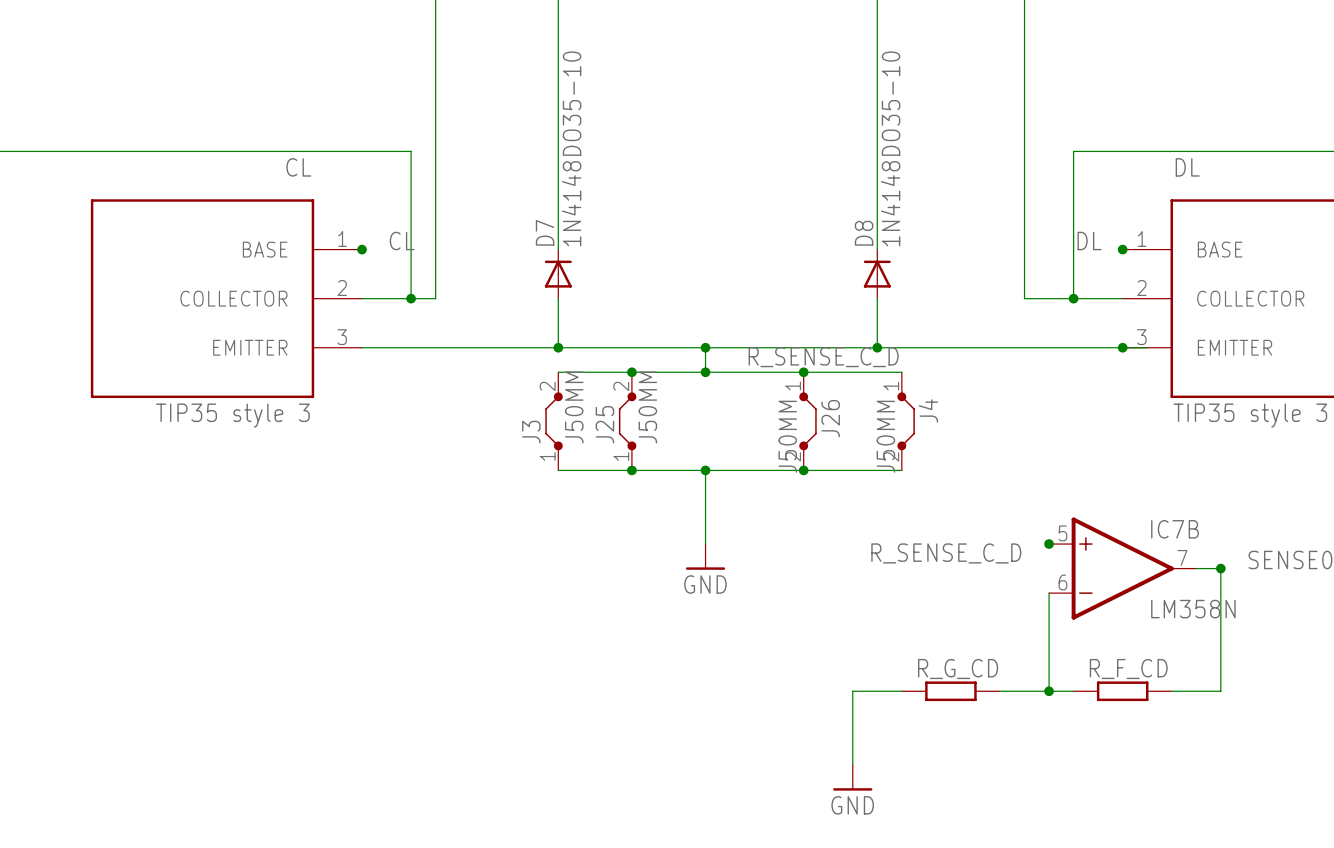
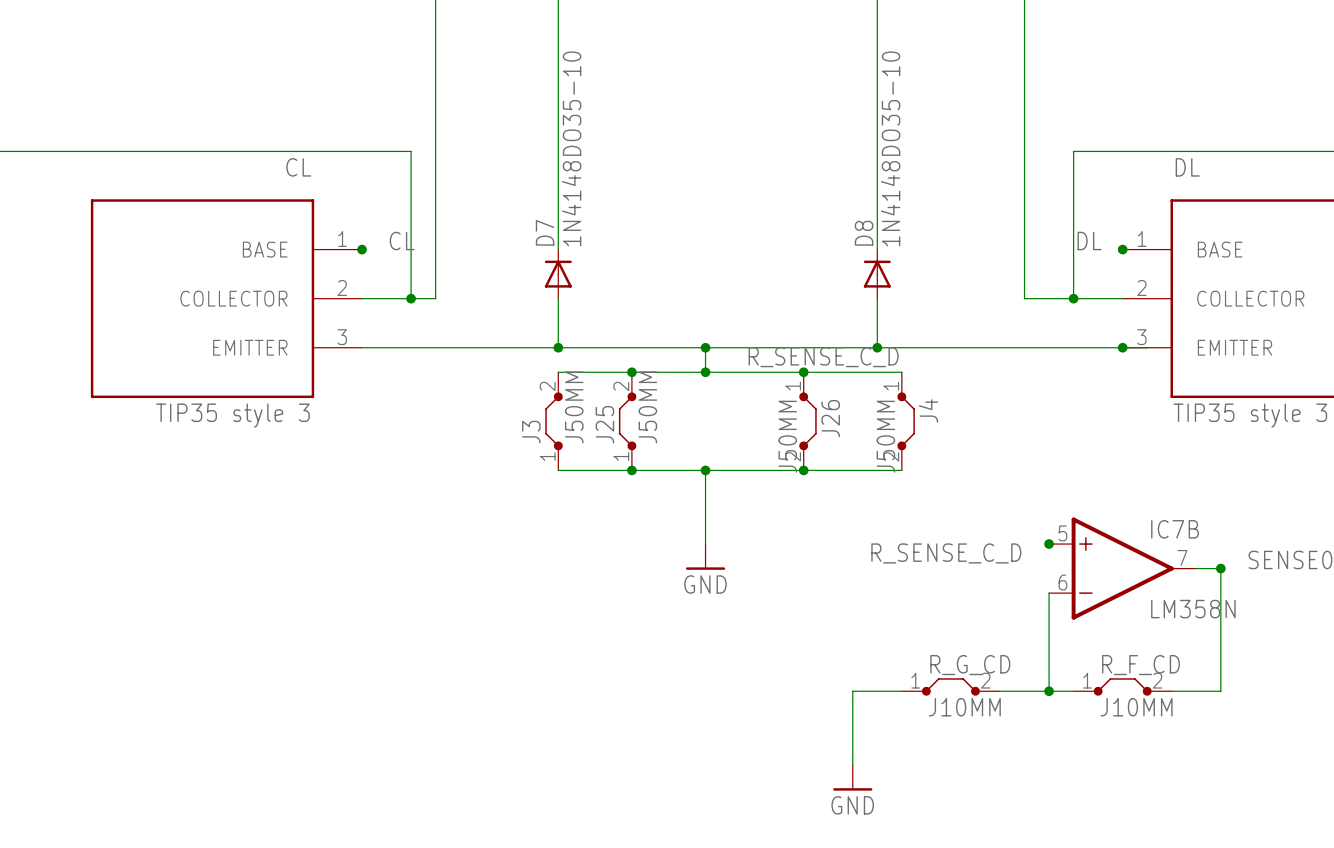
R_G_CD symbol: [901, 681, 1000, 702] -> [901, 678, 1000, 696]
R_F_CD symbol: [1073, 681, 1172, 702] -> [1073, 678, 1172, 696]
R_G_CD value: none -> J10MM (964, 707)
R_F_CD value: none -> J10MM (1136, 707)

